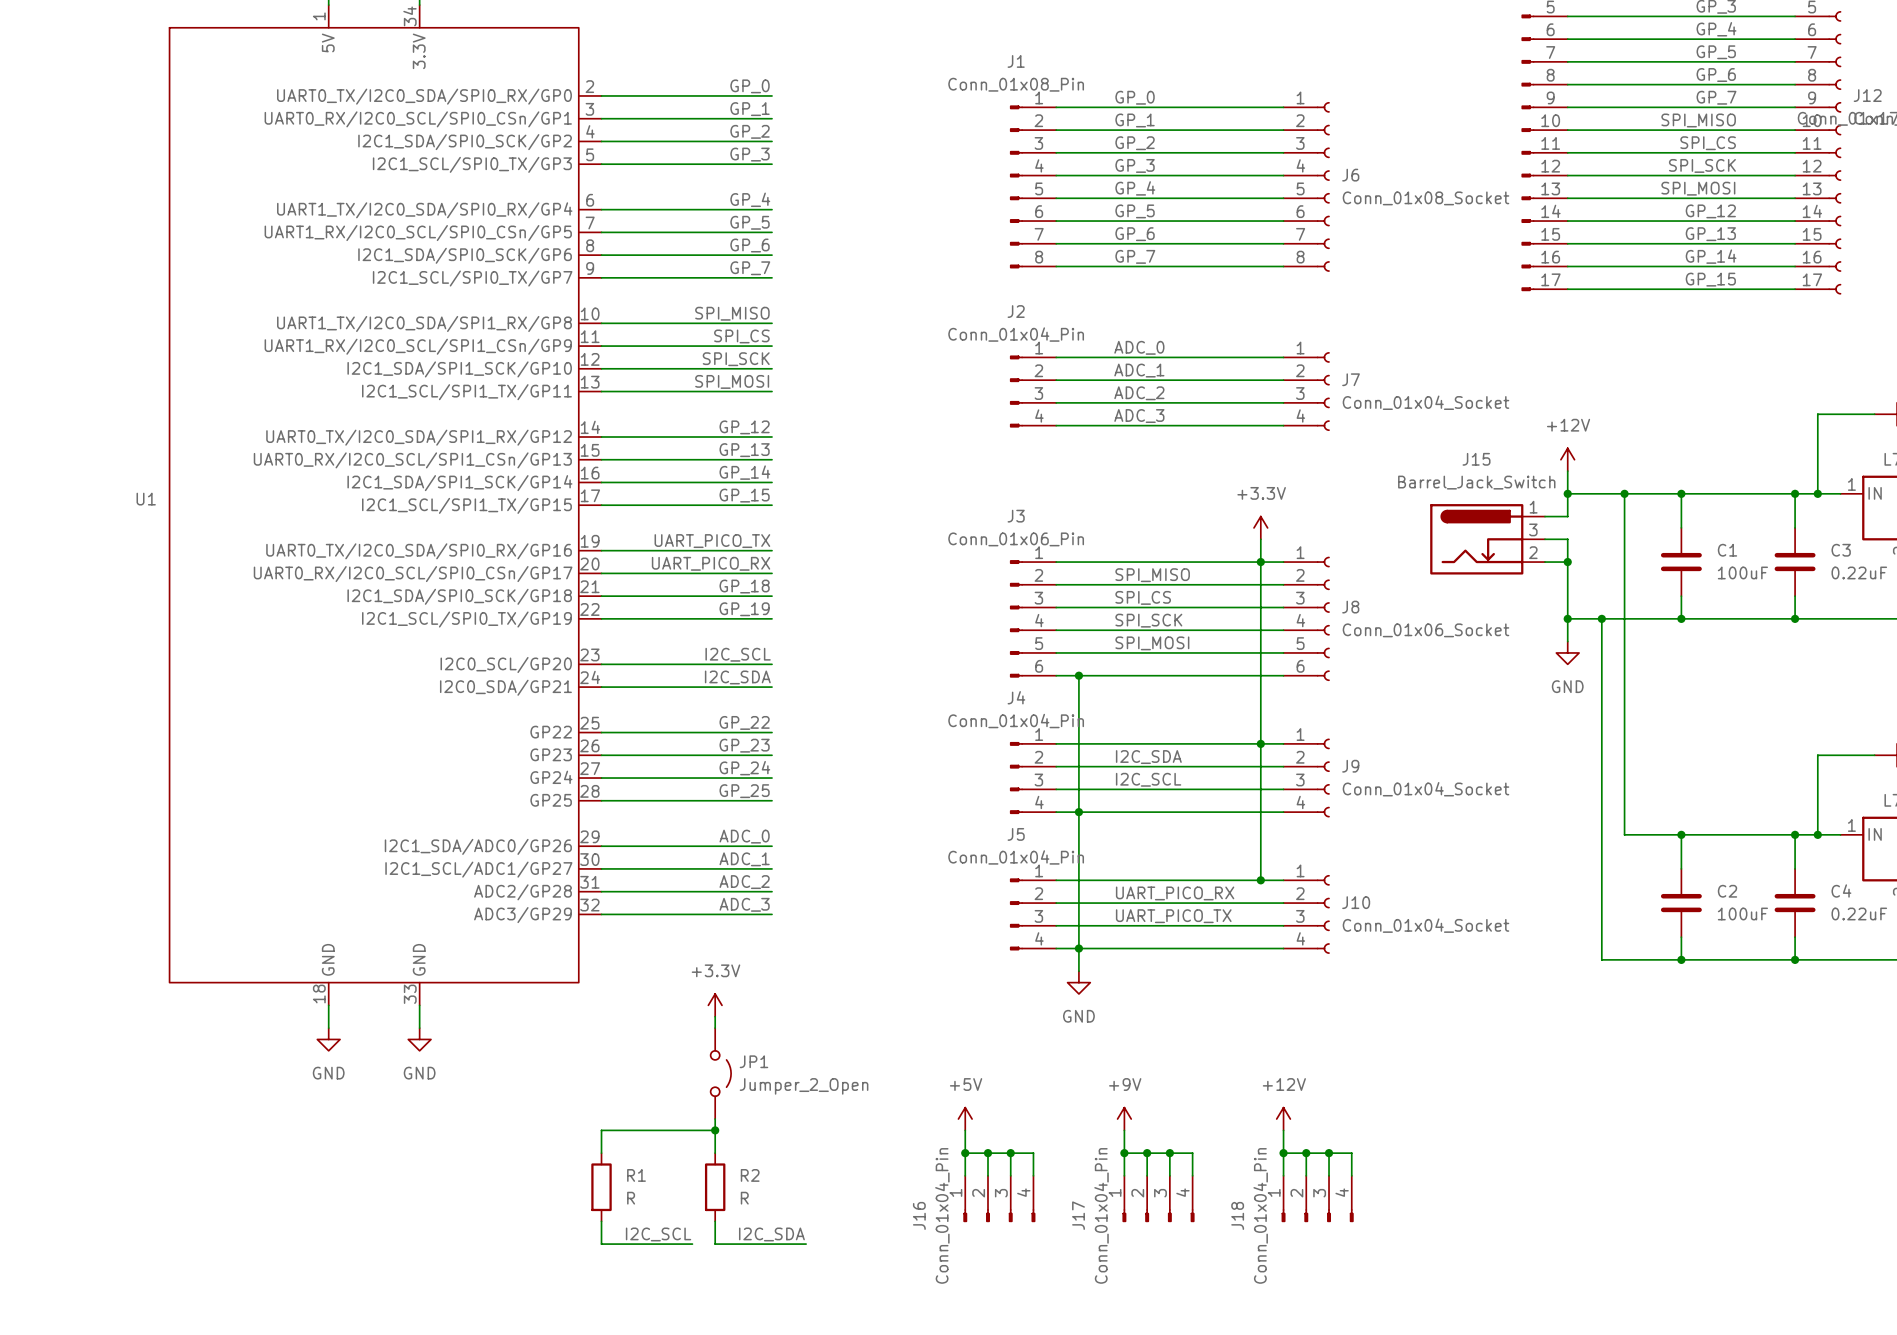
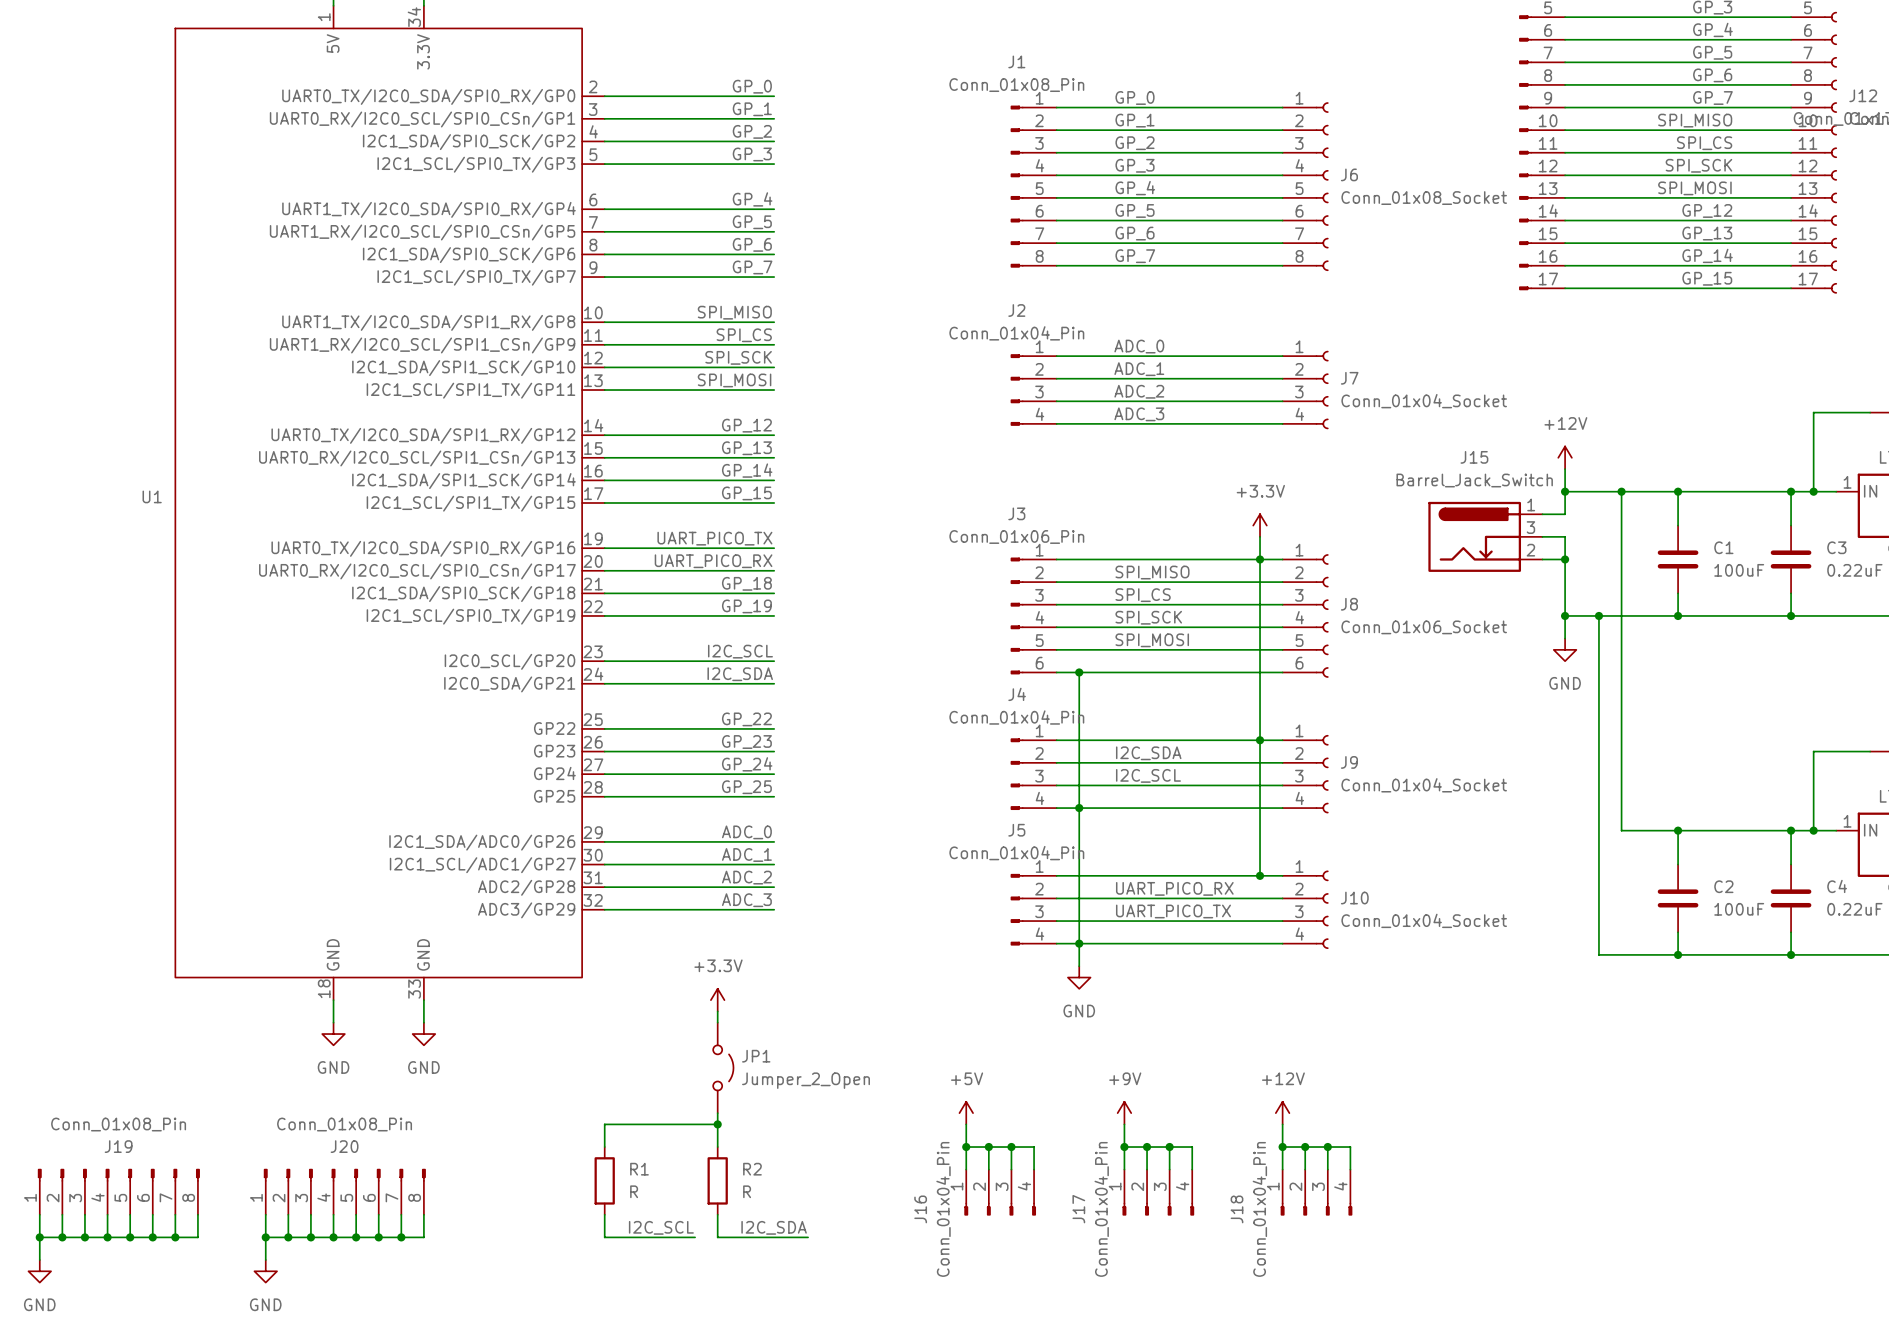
J19: none -> Conn_01x08_Pin (118, 1191)
J20: none -> Conn_01x08_Pin (344, 1191)
wire: none -> (39, 1214) (39, 1259)
wire: none -> (62, 1214) (62, 1237)
wire: none -> (84, 1214) (84, 1237)
wire: none -> (107, 1214) (107, 1237)
wire: none -> (130, 1214) (130, 1237)
wire: none -> (152, 1214) (152, 1237)
wire: none -> (175, 1214) (175, 1237)
wire: none -> (197, 1214) (197, 1237) (39, 1237)
wire: none -> (265, 1214) (265, 1259)
wire: none -> (288, 1214) (288, 1237)
wire: none -> (310, 1214) (310, 1237)
wire: none -> (333, 1214) (333, 1237)
wire: none -> (356, 1214) (356, 1237)
wire: none -> (378, 1214) (378, 1237)
wire: none -> (401, 1214) (401, 1237)
wire: none -> (423, 1214) (423, 1237) (265, 1237)
junction: none -> (39, 1237)
junction: none -> (62, 1237)
junction: none -> (84, 1237)
junction: none -> (107, 1237)
junction: none -> (130, 1237)
junction: none -> (152, 1237)
junction: none -> (175, 1237)
junction: none -> (265, 1237)
junction: none -> (288, 1237)
junction: none -> (310, 1237)
junction: none -> (333, 1237)
junction: none -> (356, 1237)
junction: none -> (378, 1237)
junction: none -> (401, 1237)
power symbol: none -> GND (39, 1271)
power symbol: none -> GND (265, 1271)

